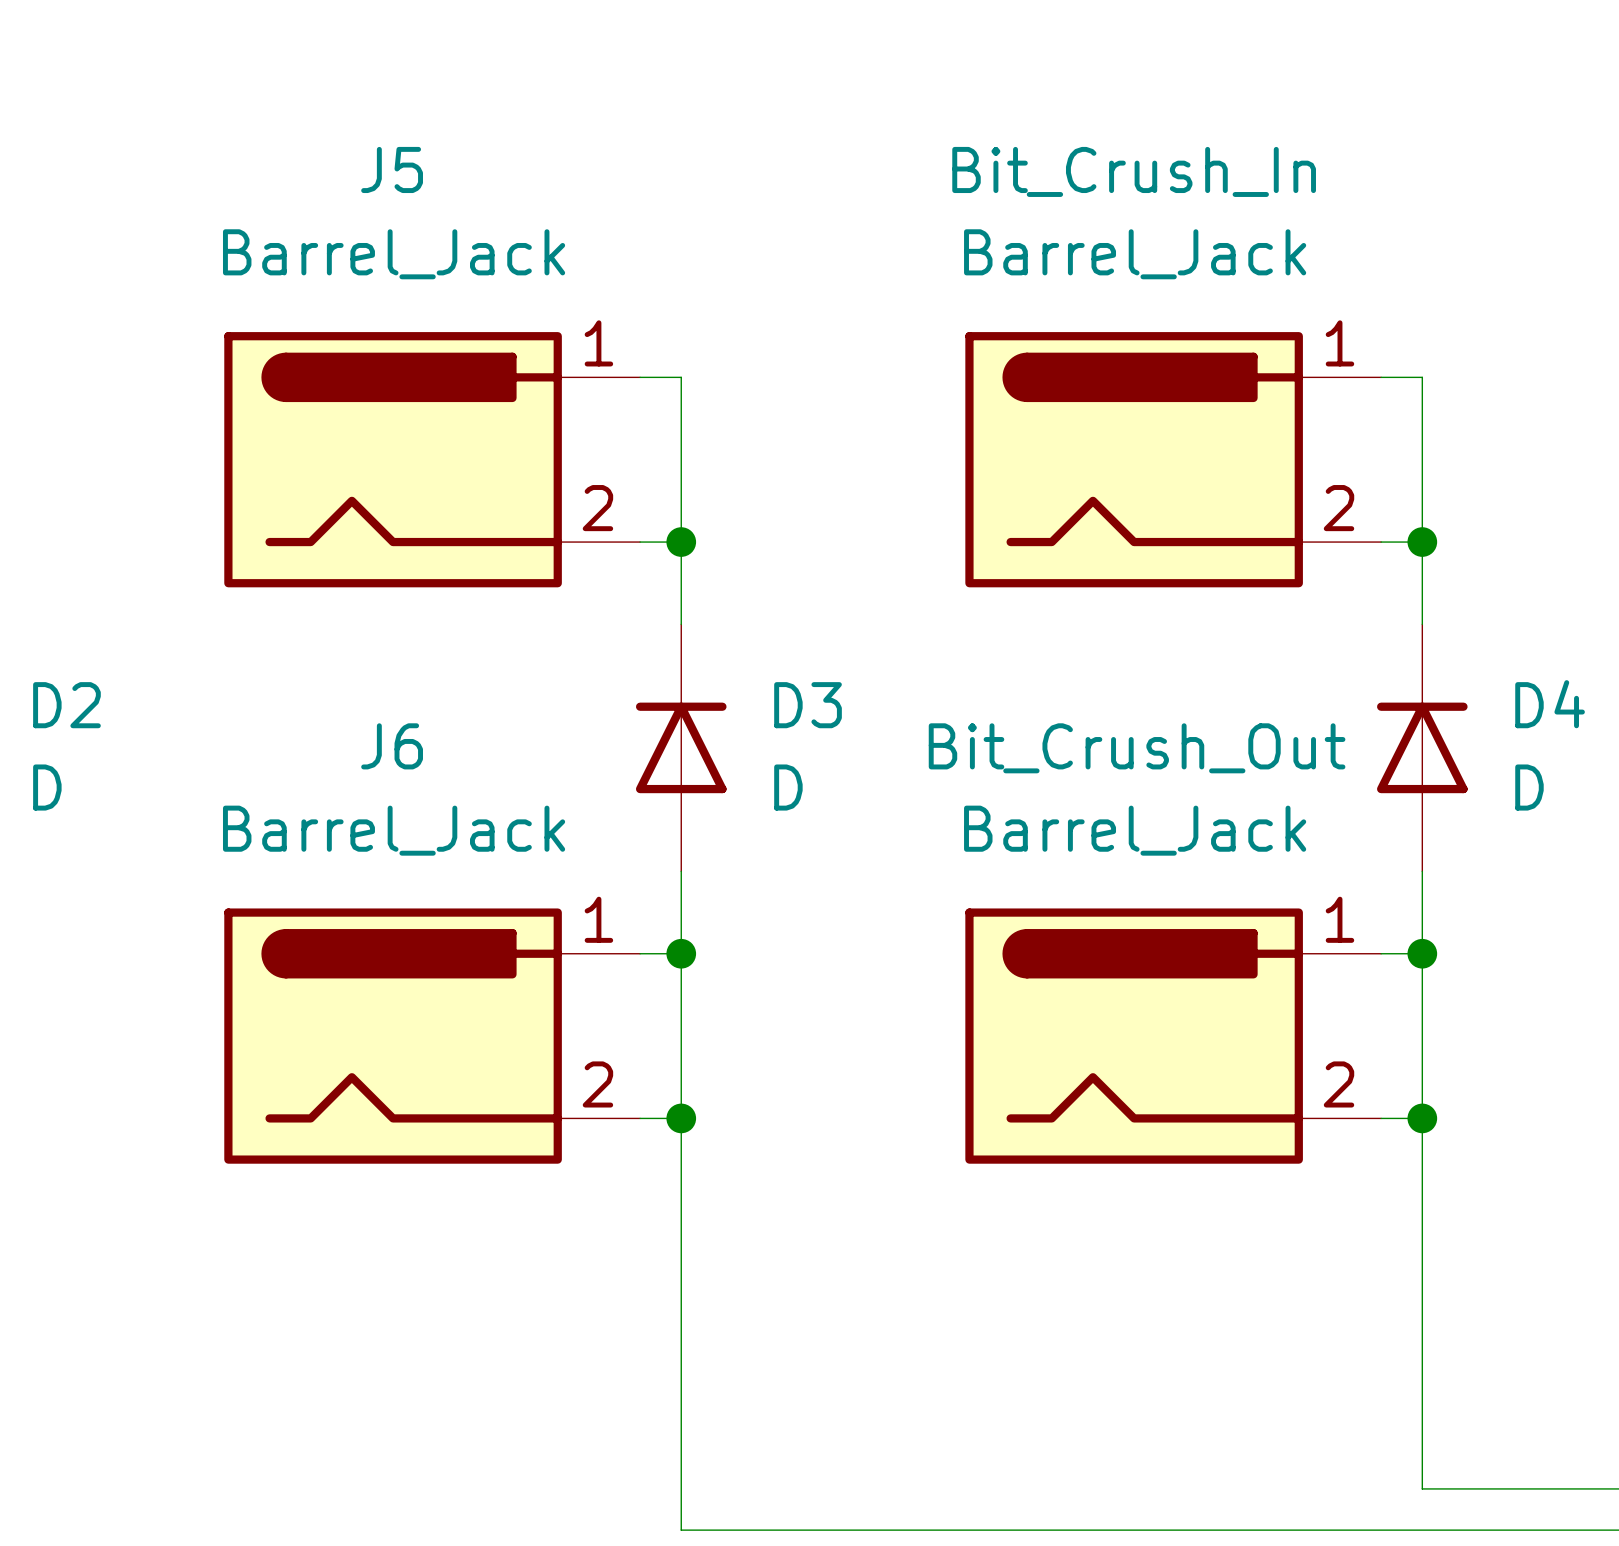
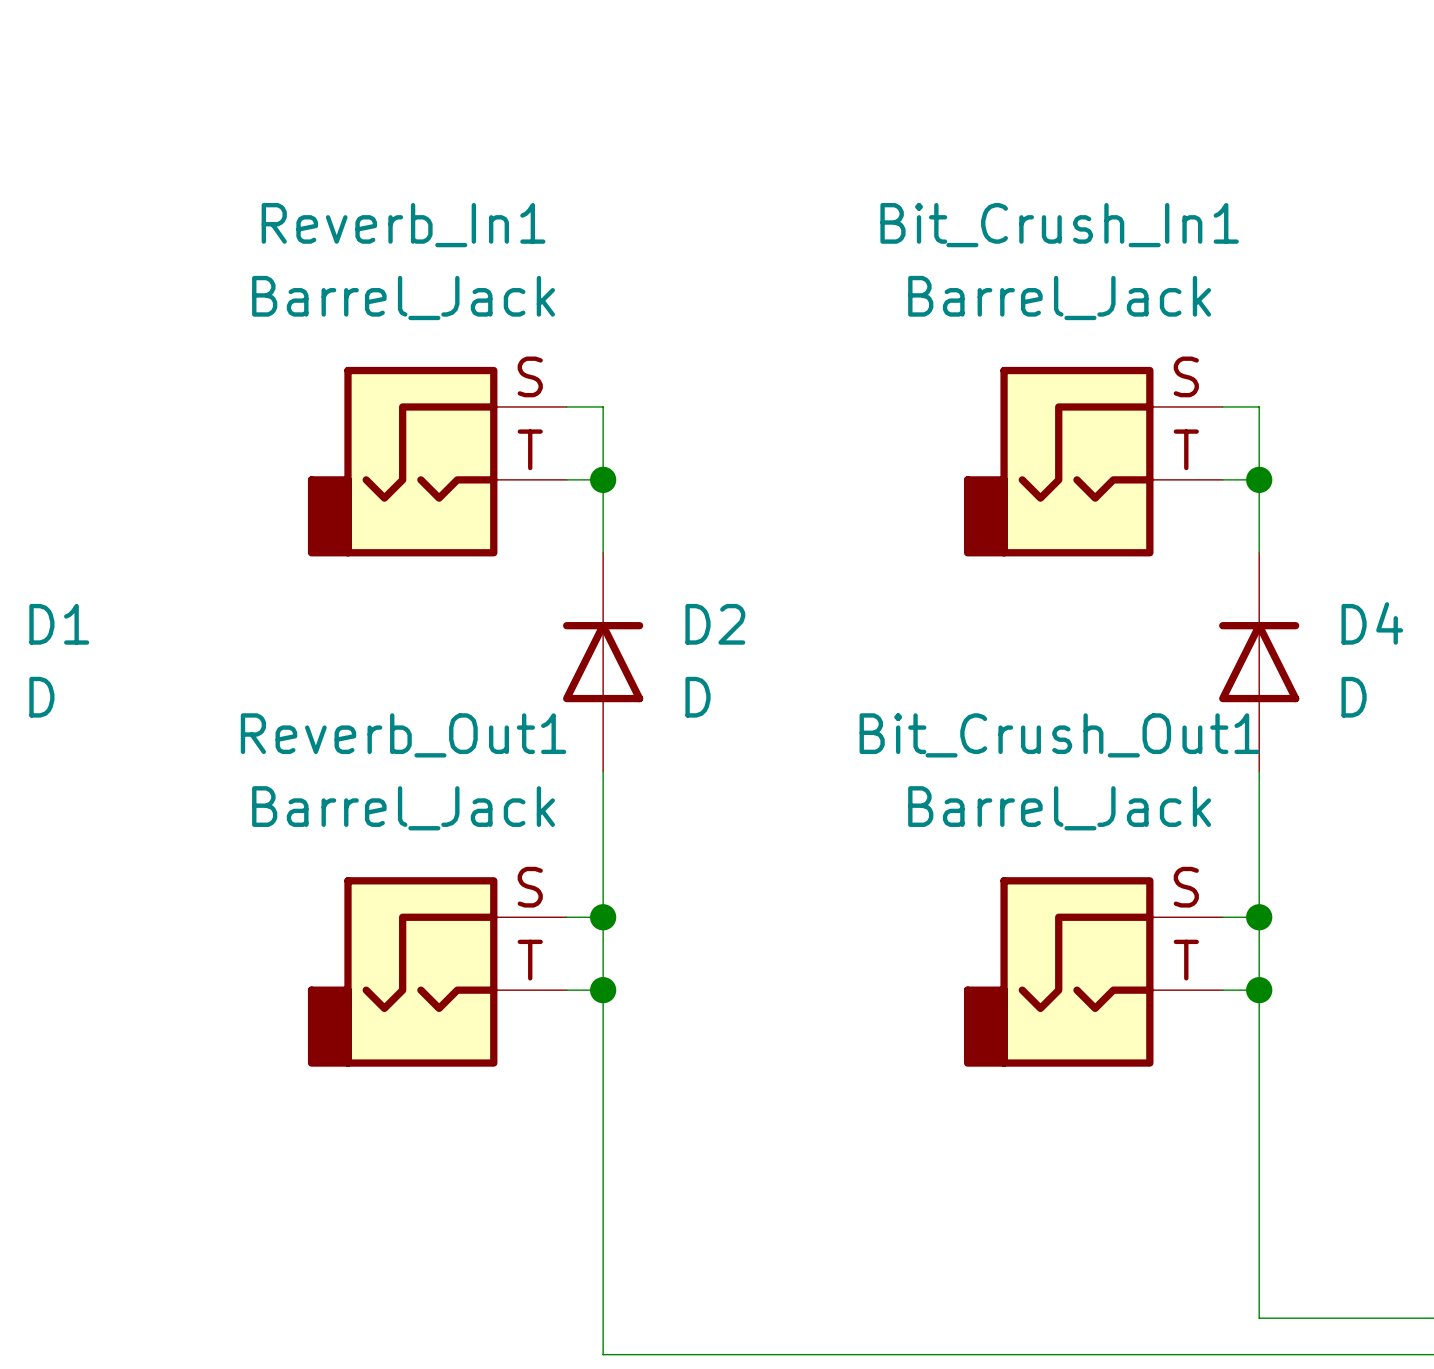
wire: (640, 377) (681, 377) (681, 459) -> (566, 406) (603, 406)
wire: (1381, 377) (1422, 377) (1422, 459) -> (1222, 406) (1259, 406)
J5: Barrel_Jack (432, 459) -> none
Bit_Crush_In: Barrel_Jack (1173, 459) -> none
Reverb_In1: none -> Barrel_Jack (437, 461)
Bit_Crush_In1: none -> Barrel_Jack (1093, 461)
D2 name: D2 (66, 705) -> D1 (59, 624)
D3 name: D3 (808, 705) -> D2 (715, 624)
wire: (640, 953) (681, 953) -> (566, 917) (603, 917)
junction position: (681, 953) -> (603, 917)
wire: (1381, 953) (1422, 953) -> (1222, 917) (1259, 917)
junction position: (1422, 953) -> (1259, 917)
J6: Barrel_Jack (432, 1036) -> none
Bit_Crush_Out: Barrel_Jack (1173, 1036) -> none
Reverb_Out1: none -> Barrel_Jack (437, 971)
Bit_Crush_Out1: none -> Barrel_Jack (1093, 971)

